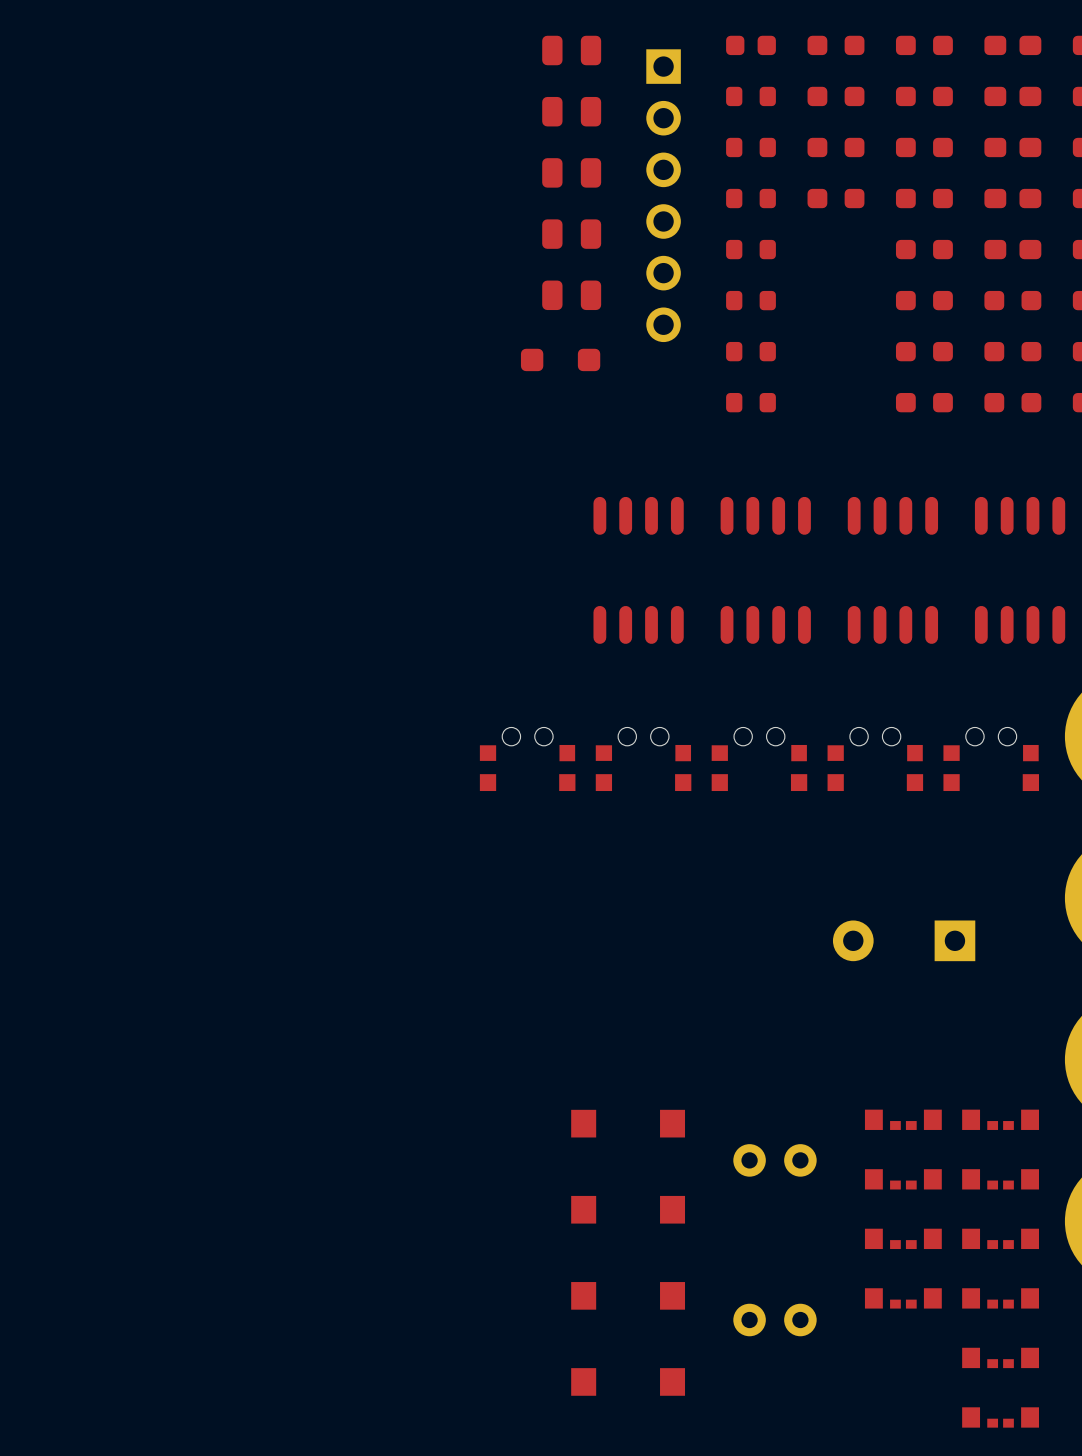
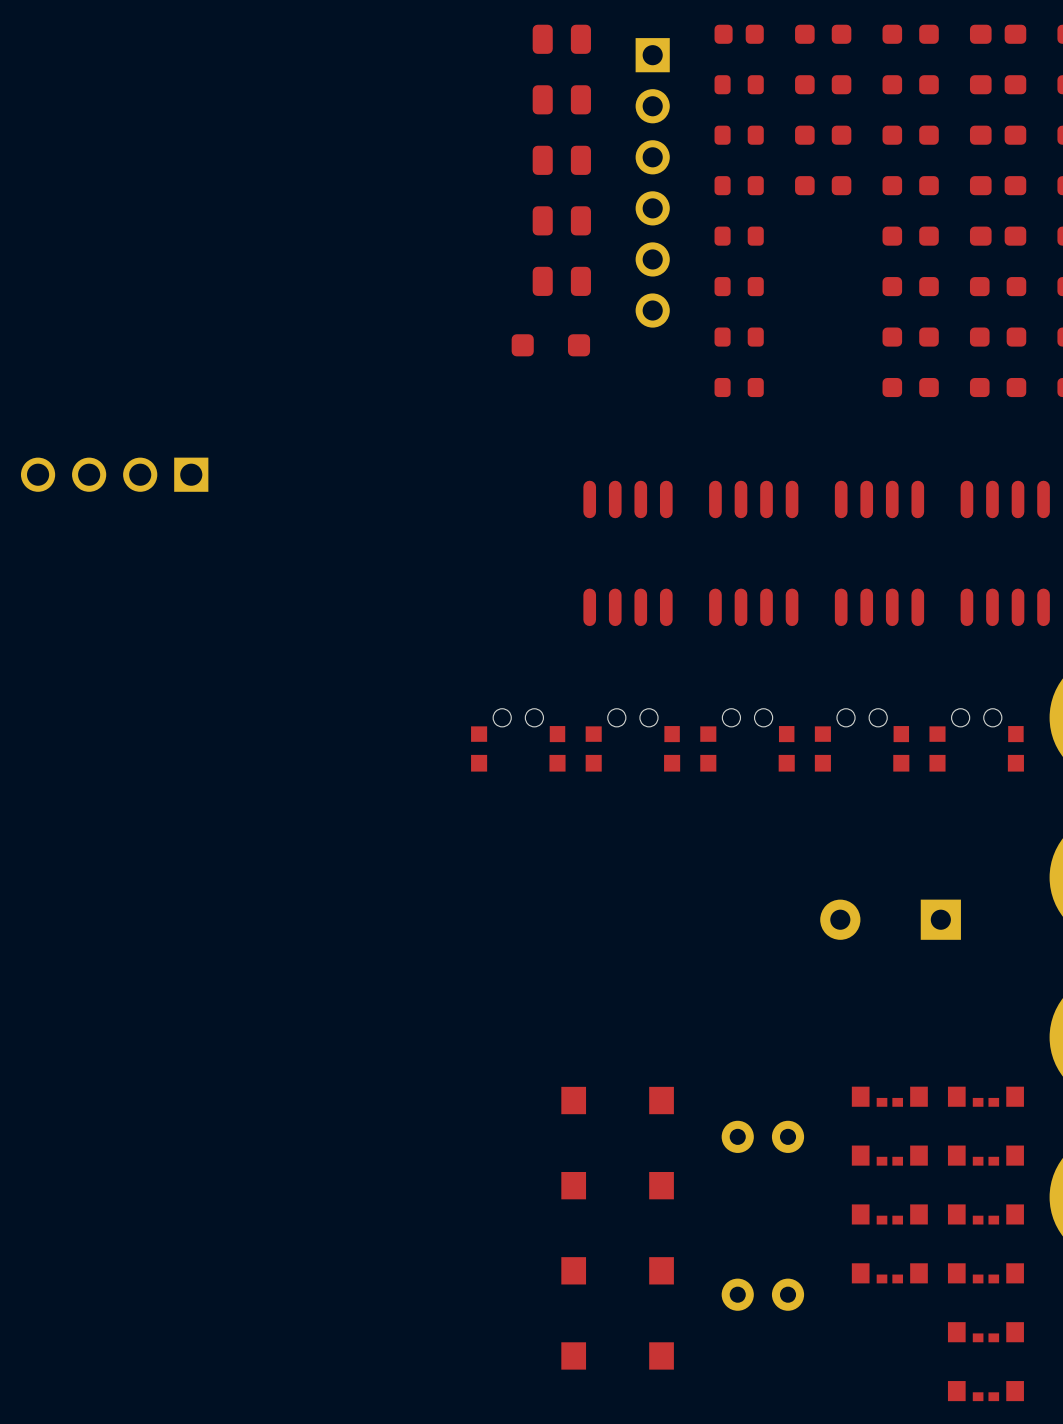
part: none -> (114, 474)

